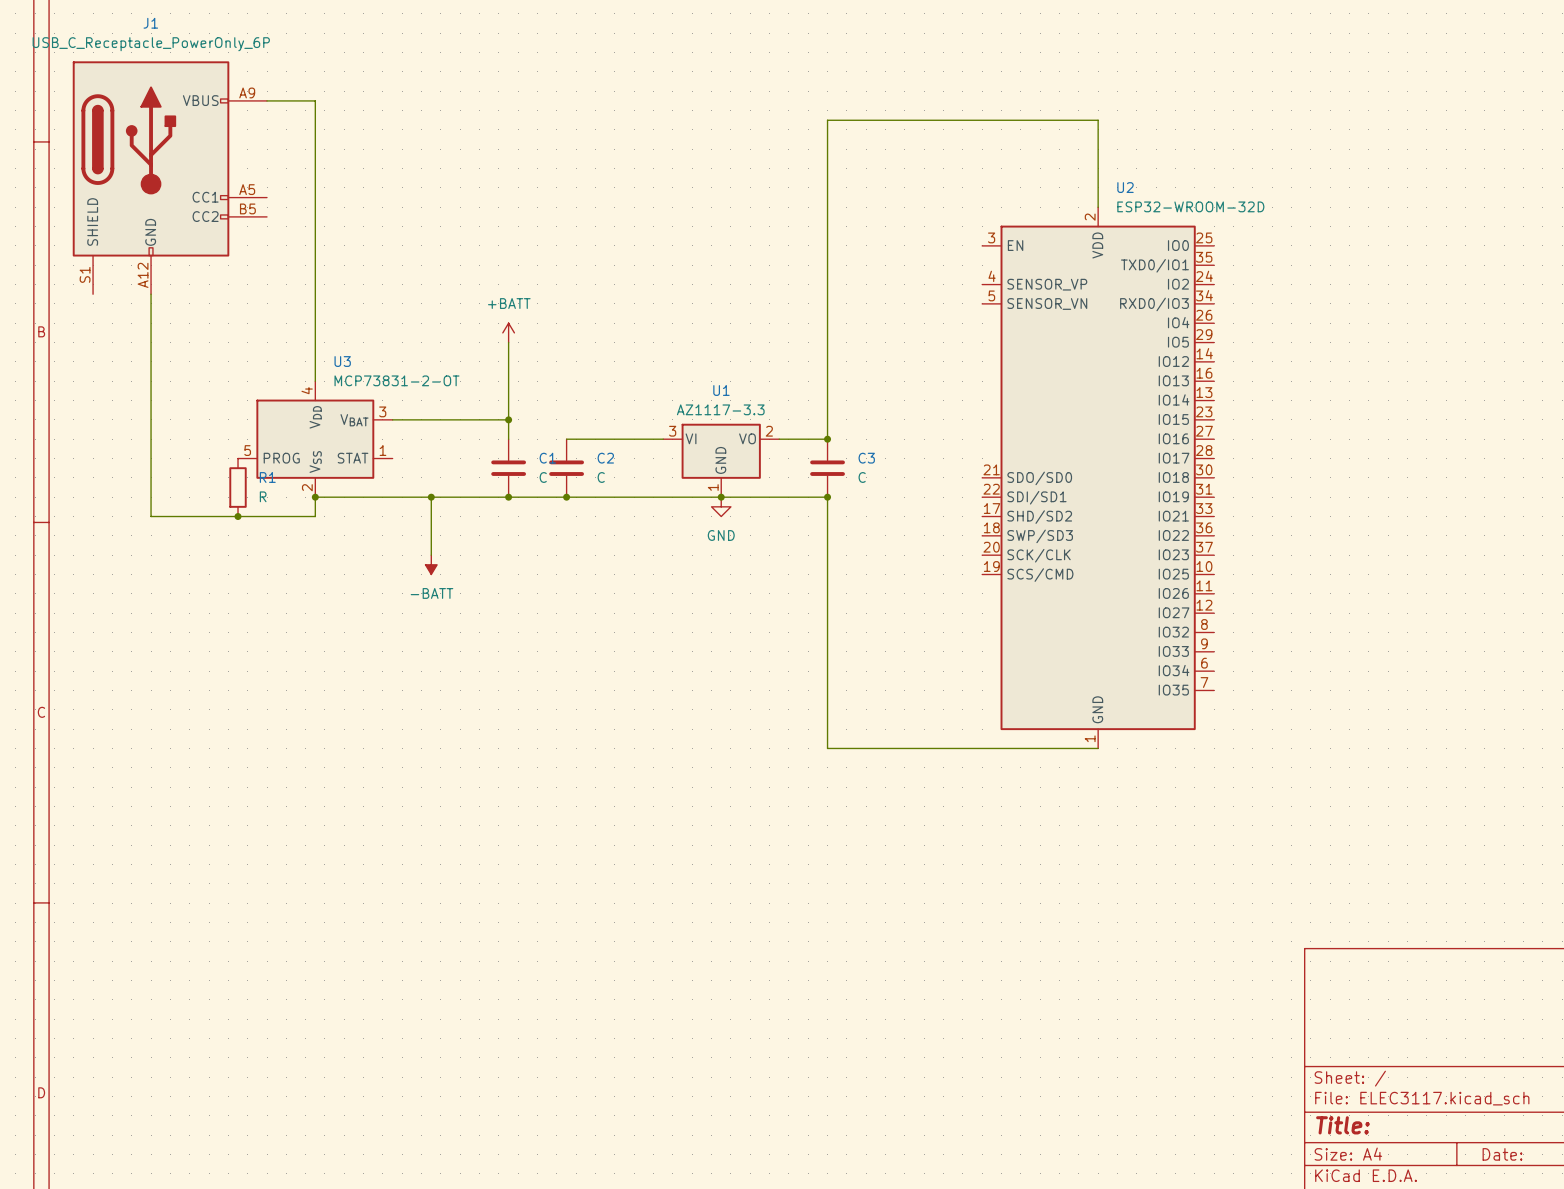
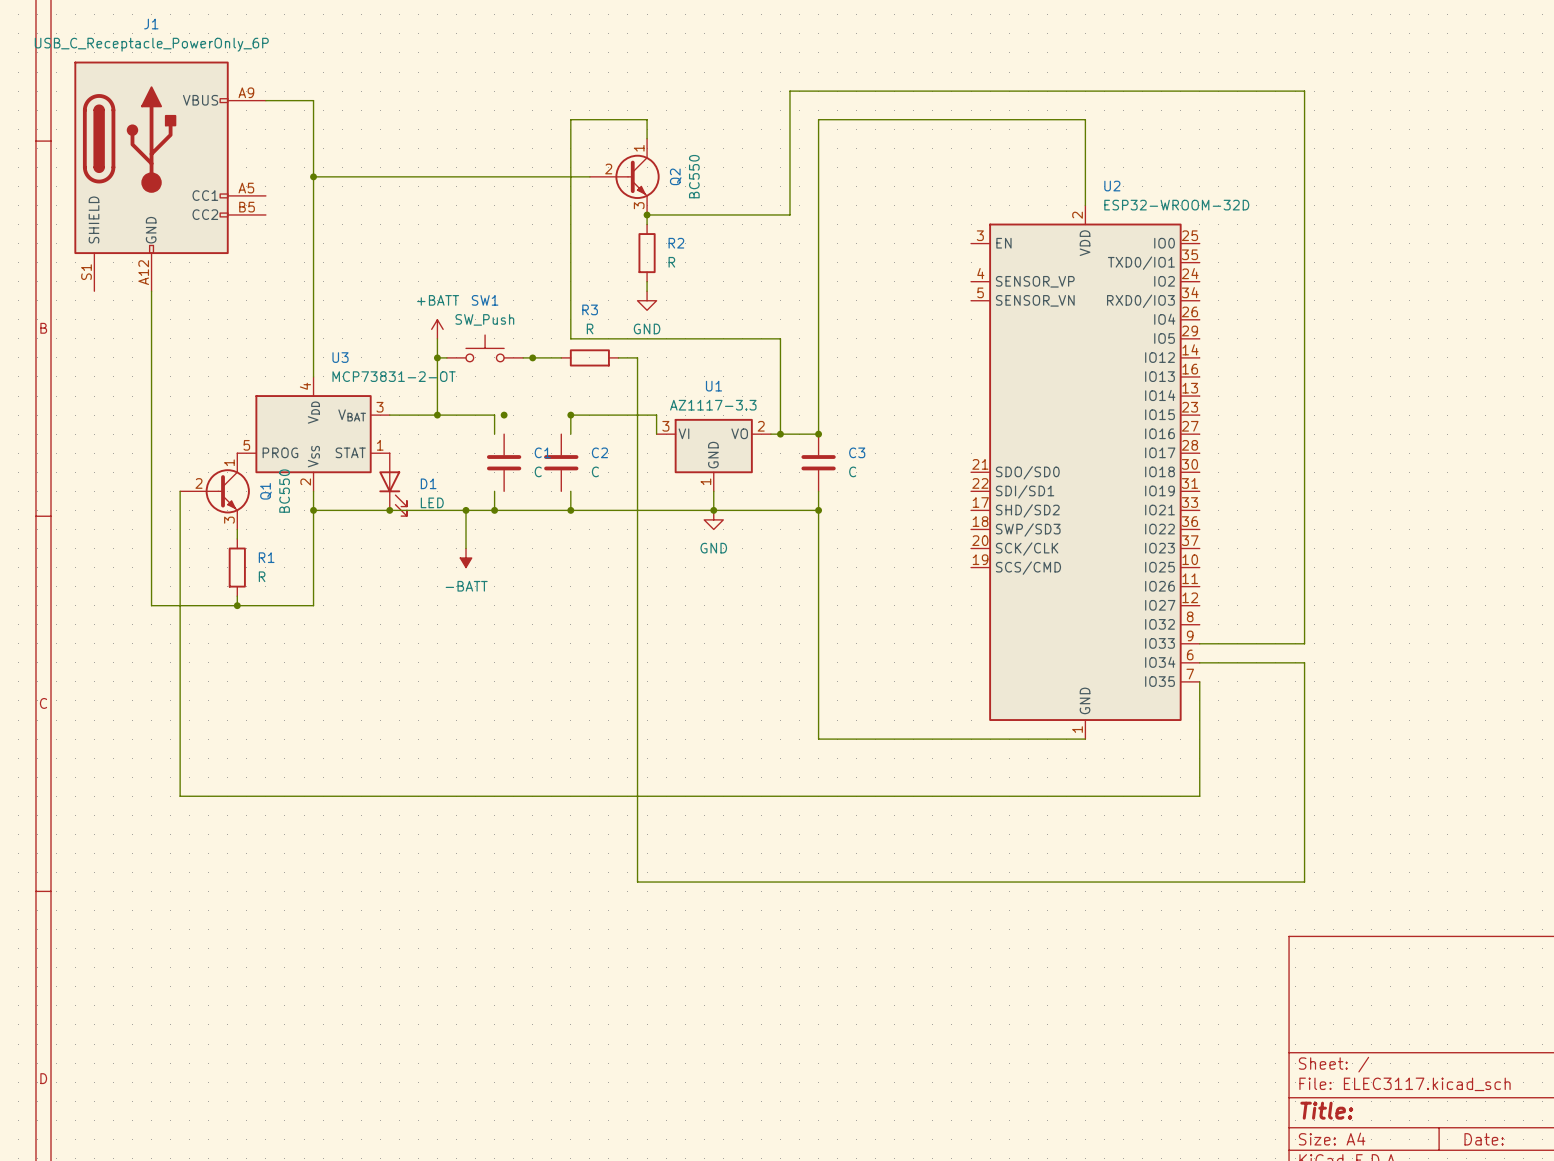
wire: none -> (647, 138) (647, 119) (570, 119) (570, 338) (780, 338) (780, 434)
wire: none -> (313, 176) (589, 176)
junction: none -> (313, 176)
Q2: none -> BC550 (624, 176)
junction: none -> (647, 214)
wire: none -> (647, 224) (647, 214) (789, 214) (789, 91) (1304, 91) (1304, 643) (1199, 643)
R2: none -> R (647, 253)
wire: none -> (647, 281) (647, 291)
power symbol: none -> GND (647, 300)
power symbol position: +BATT (508, 332) -> +BATT (437, 329)
wire: none -> (437, 338) (437, 415)
wire: (508, 342) (508, 439) -> none
SW1: none -> SW_Push (485, 348)
wire: none -> (437, 357) (446, 357)
junction: none -> (437, 357)
wire: none -> (523, 357) (561, 357)
junction: none -> (532, 357)
R3: none -> R (589, 357)
wire: none -> (618, 357) (637, 357) (637, 882) (1304, 882) (1304, 662) (1199, 662)
junction: none -> (437, 415)
wire: (498, 419) (508, 419) -> (494, 415) (494, 434)
junction: none -> (570, 415)
wire: (566, 439) (663, 439) -> (570, 434) (570, 415) (656, 415) (656, 434)
junction: none -> (780, 434)
R1 position: (238, 487) -> (237, 567)
D1: none -> LED (393, 484)
wire: none -> (180, 491) (180, 796) (1199, 796) (1199, 681)
Q1: none -> BC550 (215, 491)
wire: (315, 497) (827, 497) -> none
junction position: (315, 497) -> (313, 510)
wire: (431, 497) (431, 555) -> none
junction: (431, 497) -> none
wire: none -> (494, 491) (494, 510)
junction: (508, 497) -> none
junction position: (566, 497) -> (570, 510)
wire: none -> (570, 491) (570, 510)
junction position: (721, 497) -> (713, 510)
junction position: (827, 497) -> (818, 510)
power symbol position: GND (721, 506) -> GND (713, 519)
wire: (151, 516) (315, 516) -> (151, 510) (151, 605) (313, 605) (313, 510) (818, 510)
junction: (238, 516) -> none
junction: none -> (389, 510)
wire: none -> (466, 510) (466, 548)
junction: none -> (466, 510)
junction: none -> (494, 510)
wire: none -> (237, 529) (237, 538)
power symbol position: -BATT (431, 564) -> -BATT (466, 558)
wire: none -> (237, 596) (237, 605)
junction: none -> (237, 605)

